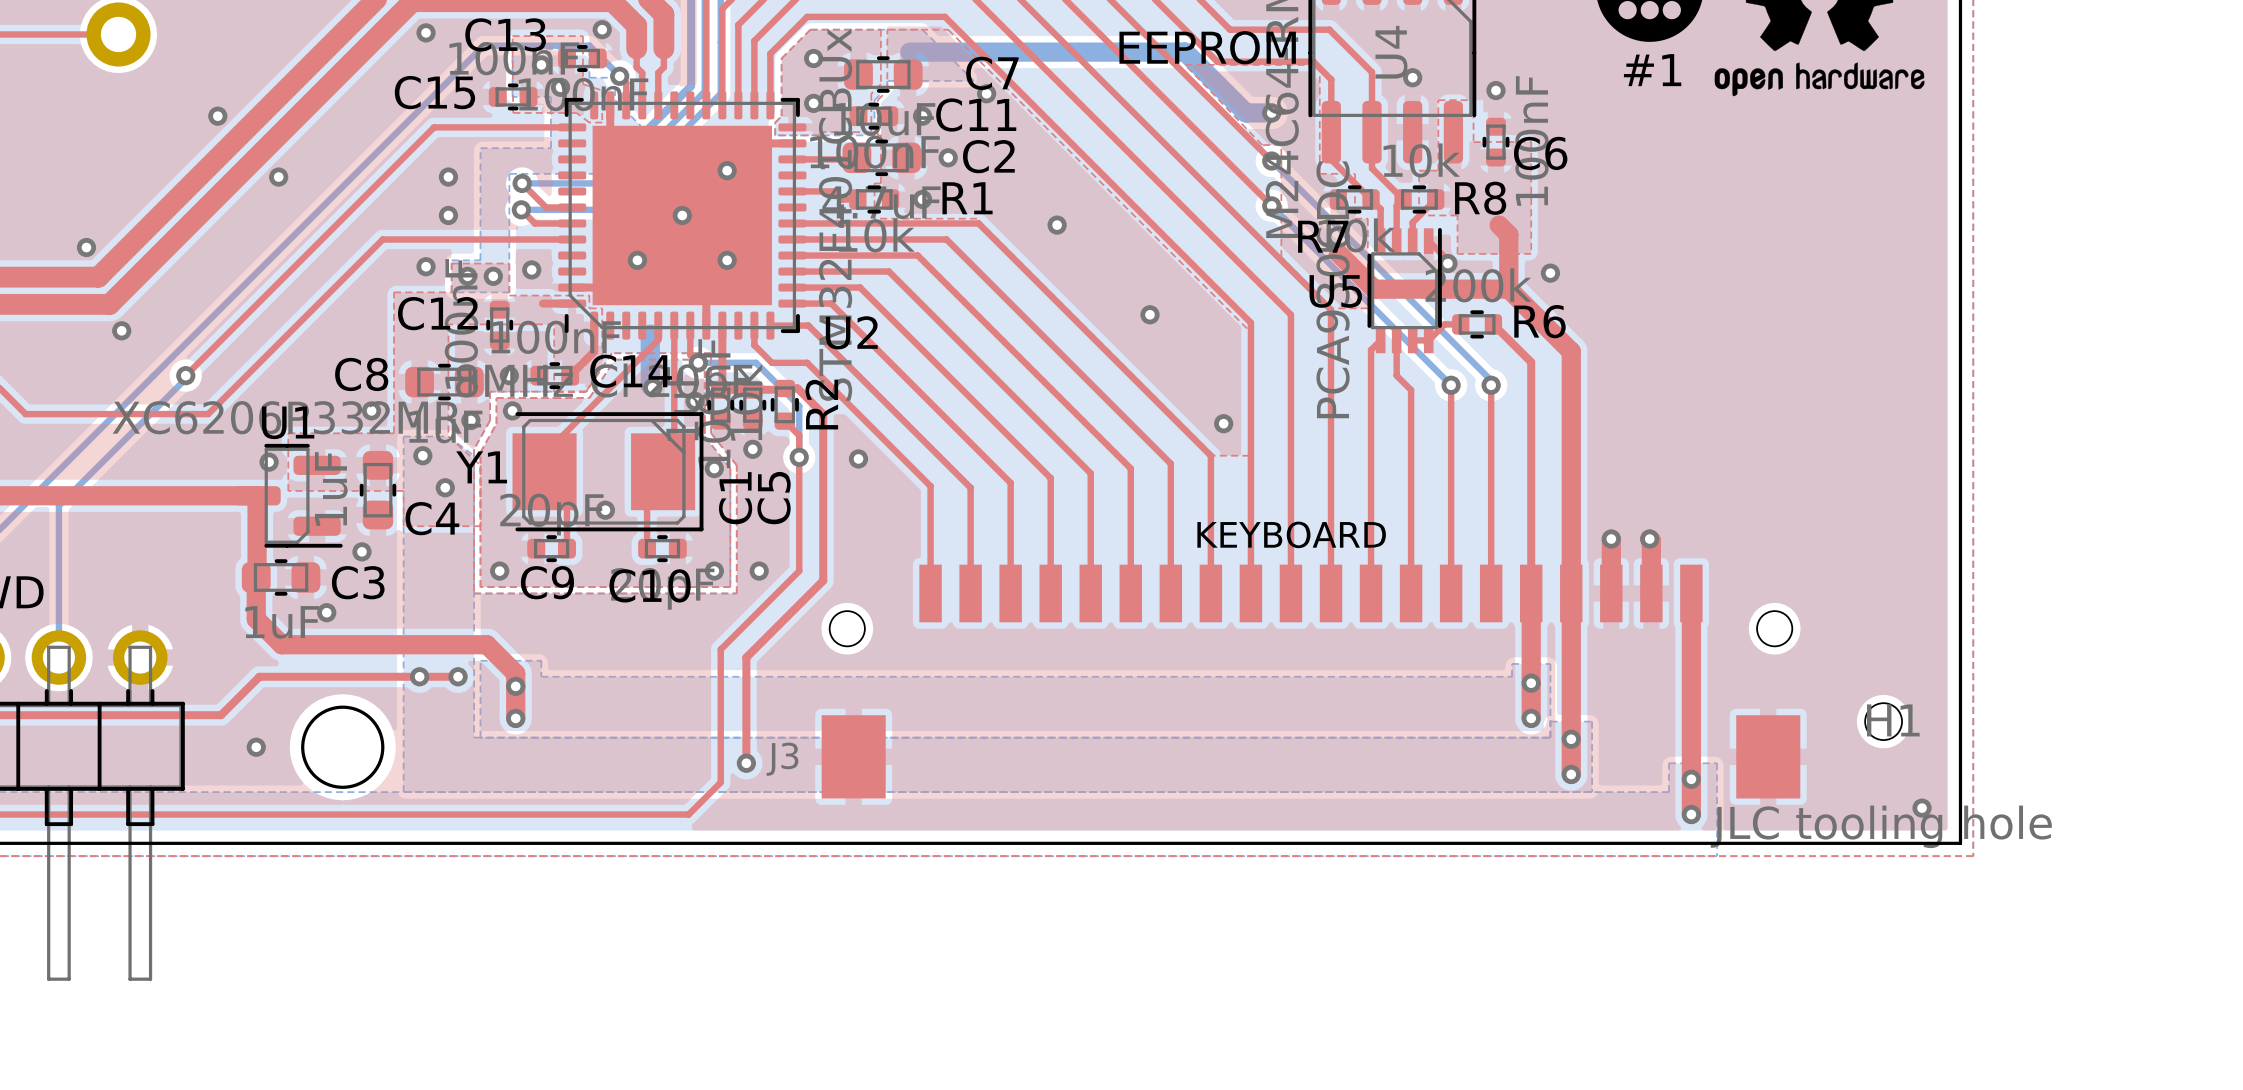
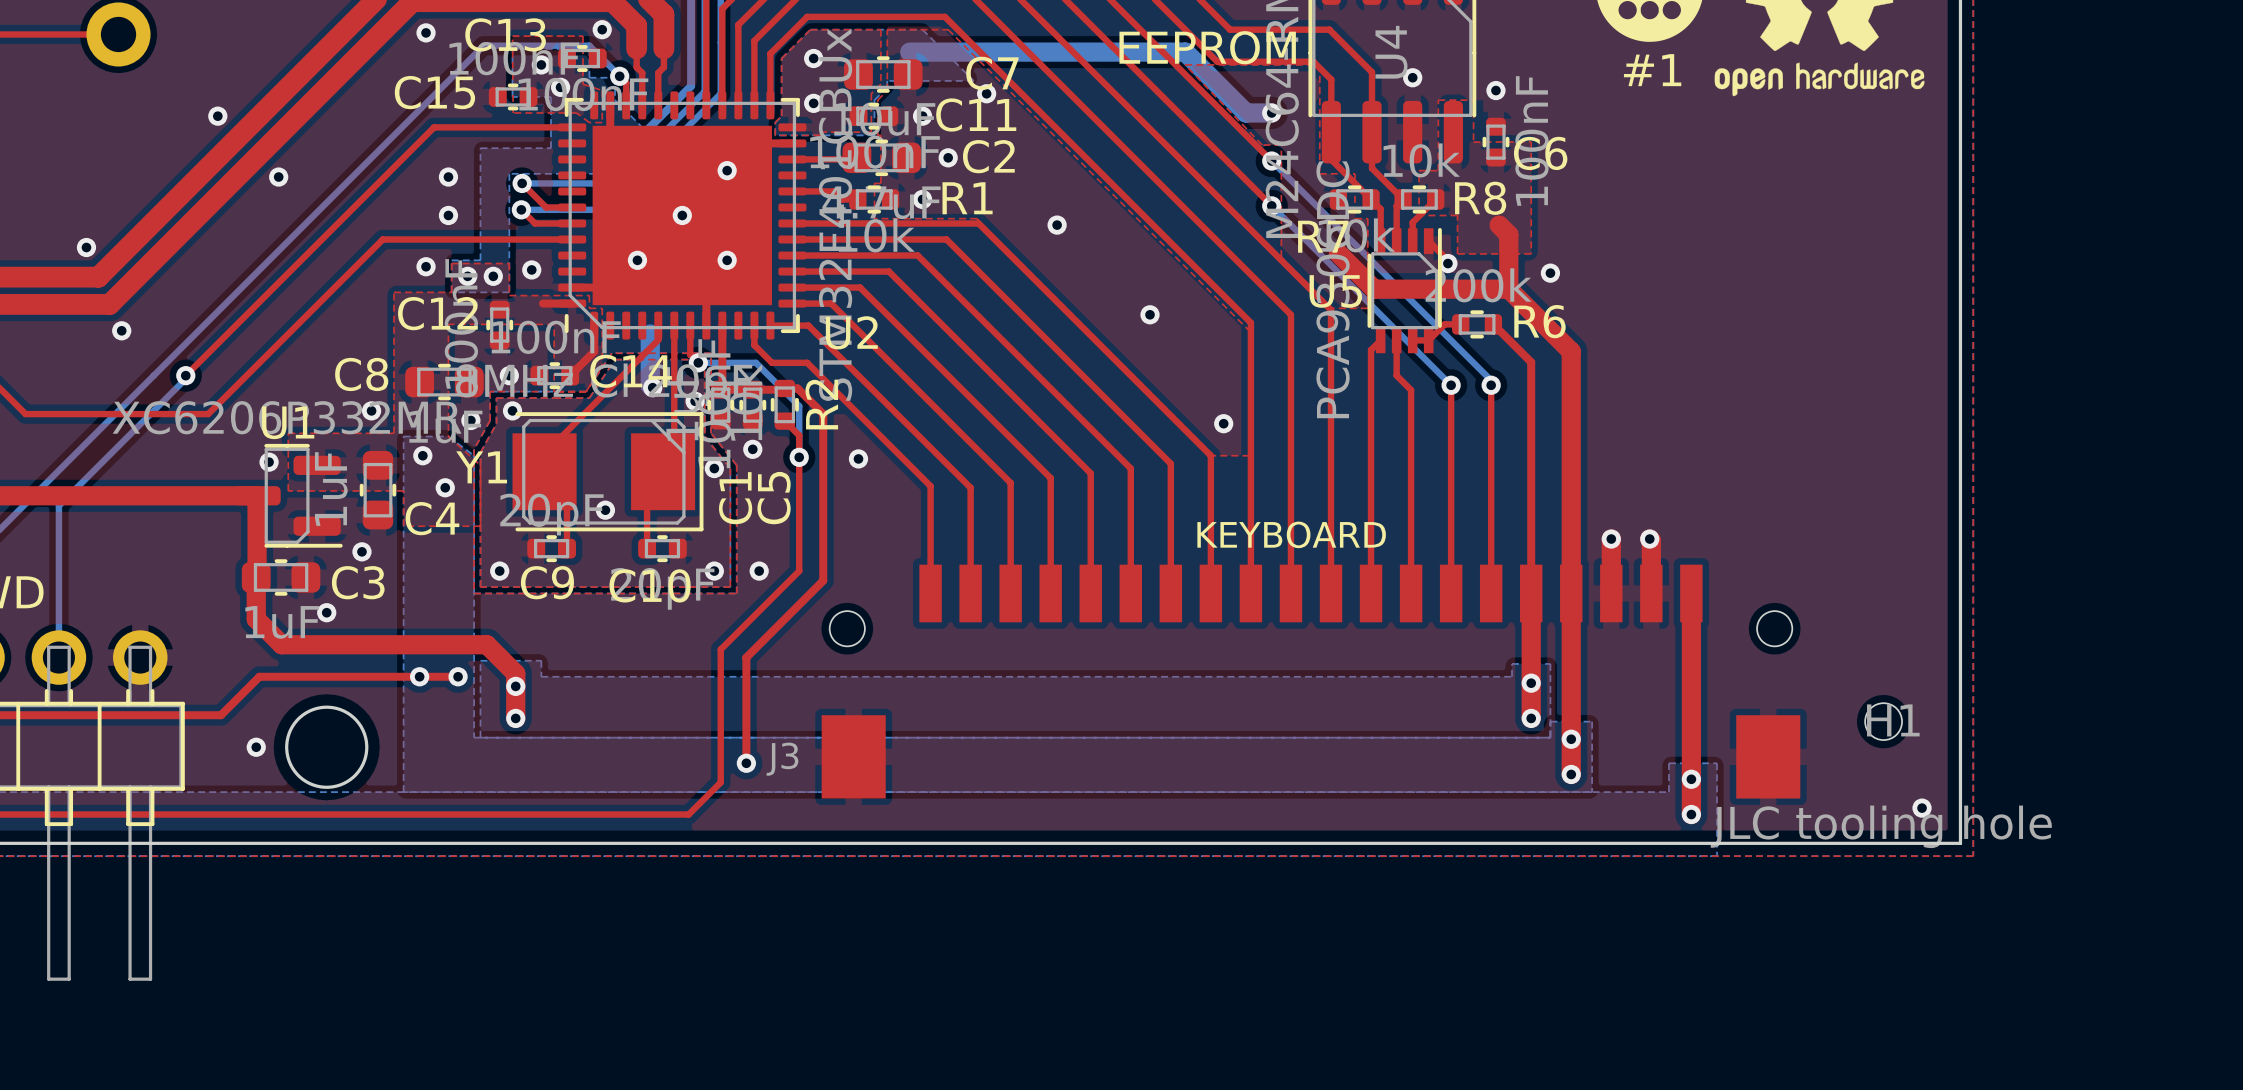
round board edge position: (342, 747) -> (326, 747)

